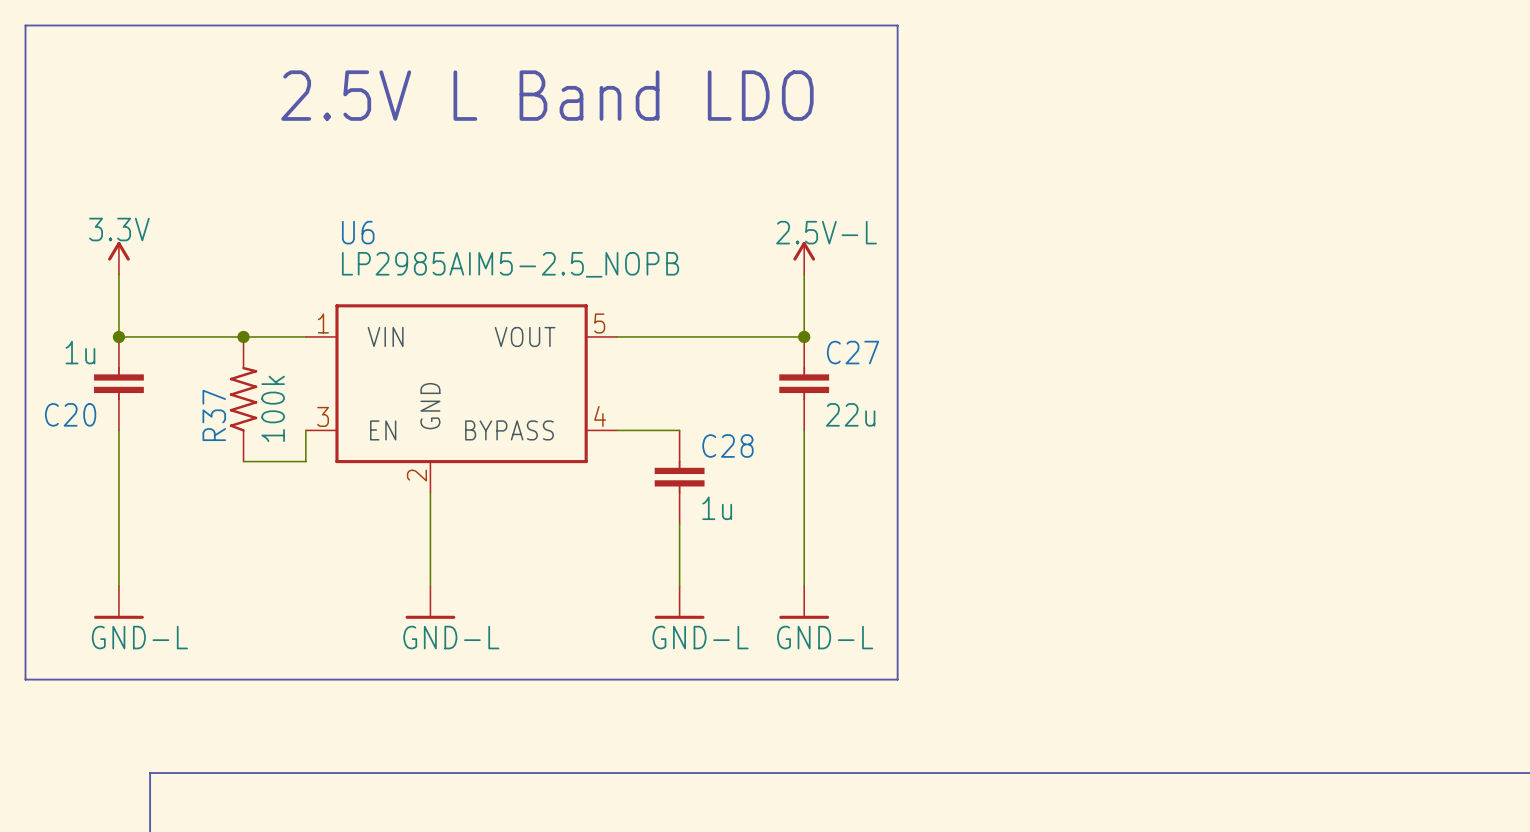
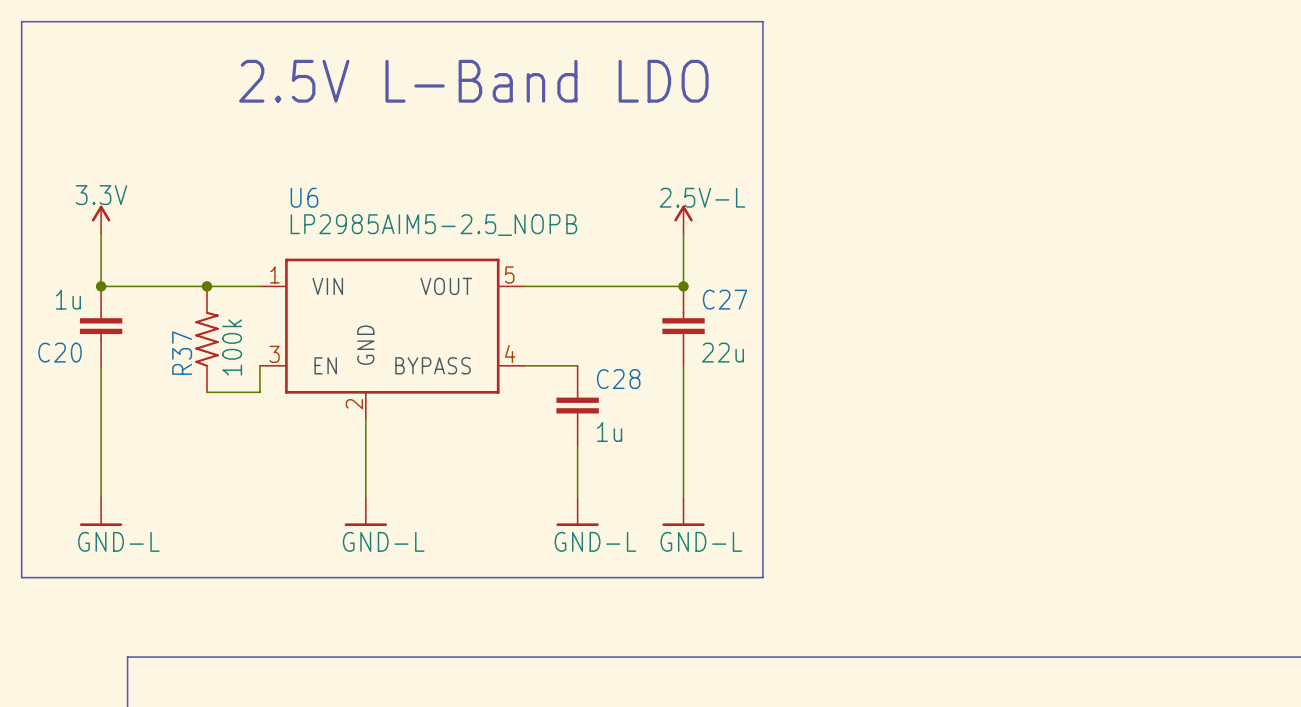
text: 2.5V L Band LDO (547, 95) -> 2.5V L-Band LDO (473, 81)

